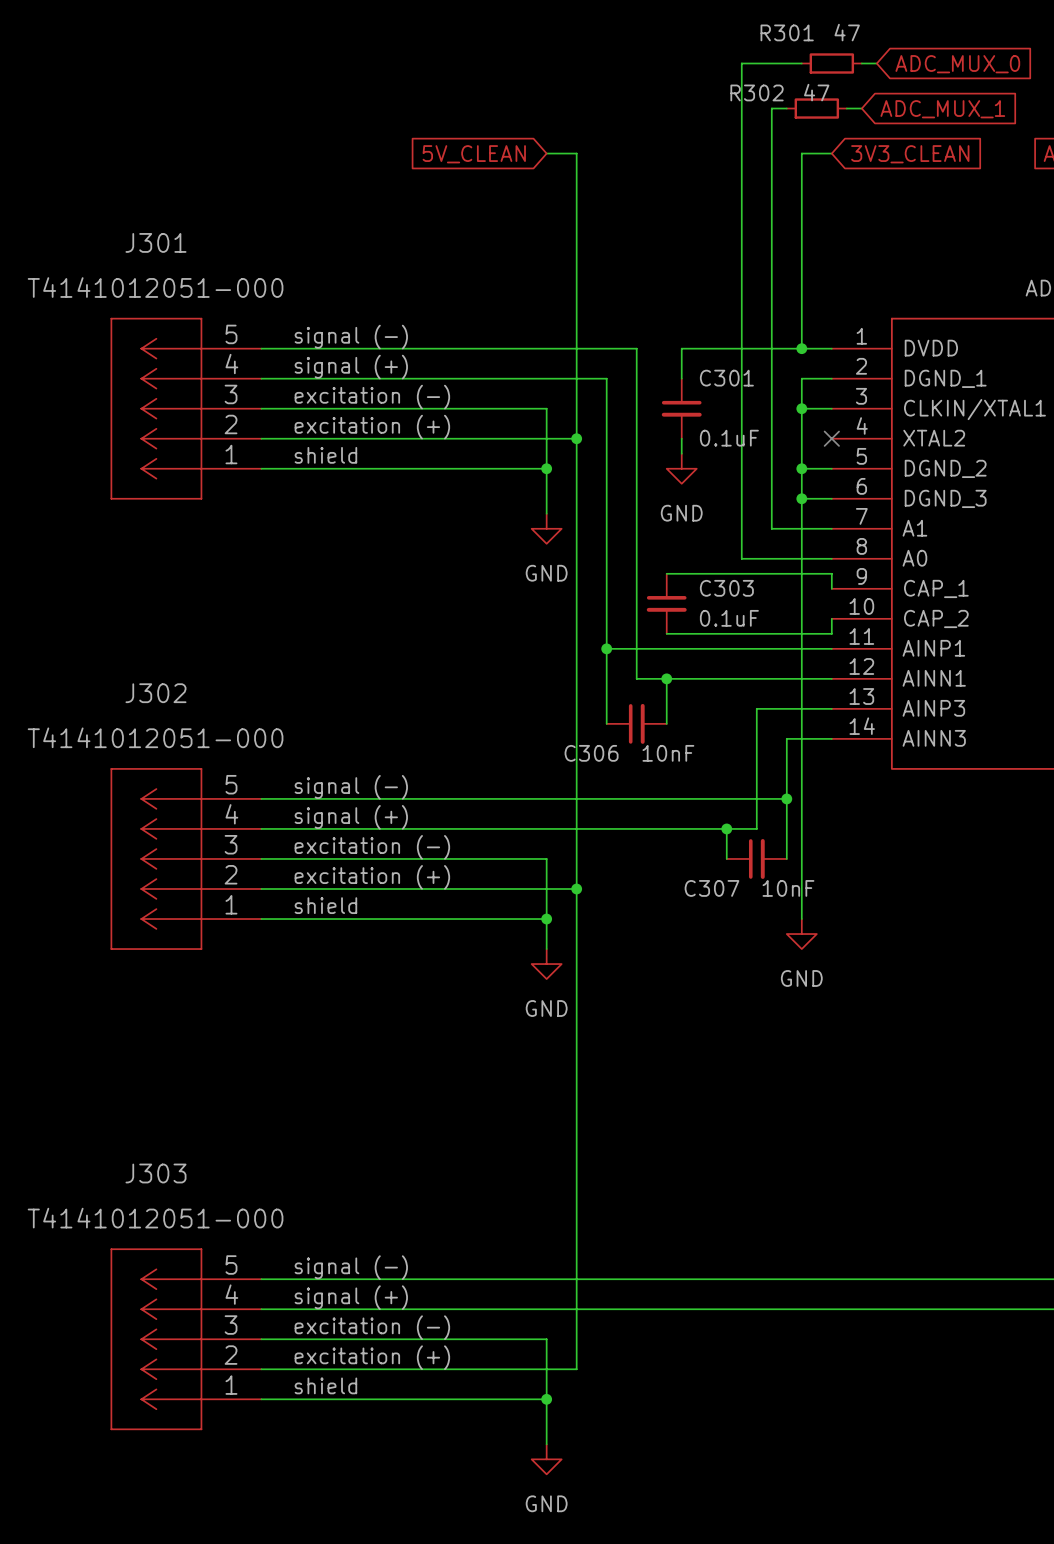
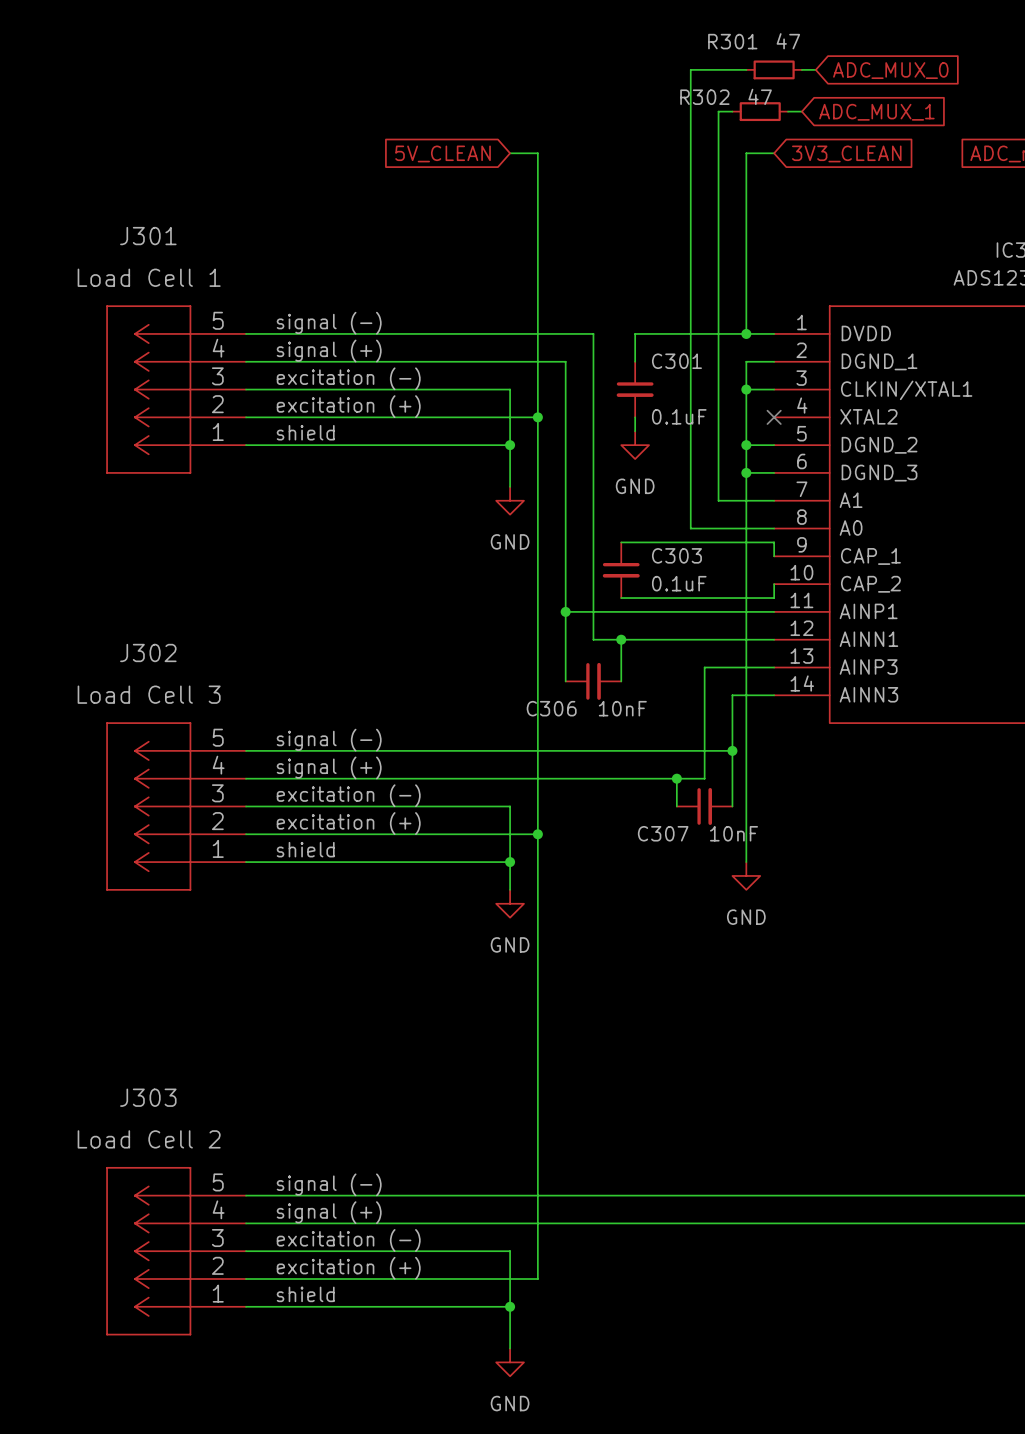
J301 value: T4141012051-000 (155, 287) -> Load Cell 1 (149, 277)
J302 value: T4141012051-000 (155, 737) -> Load Cell 3 (149, 694)
J303 value: T4141012051-000 (155, 1218) -> Load Cell 2 (149, 1139)

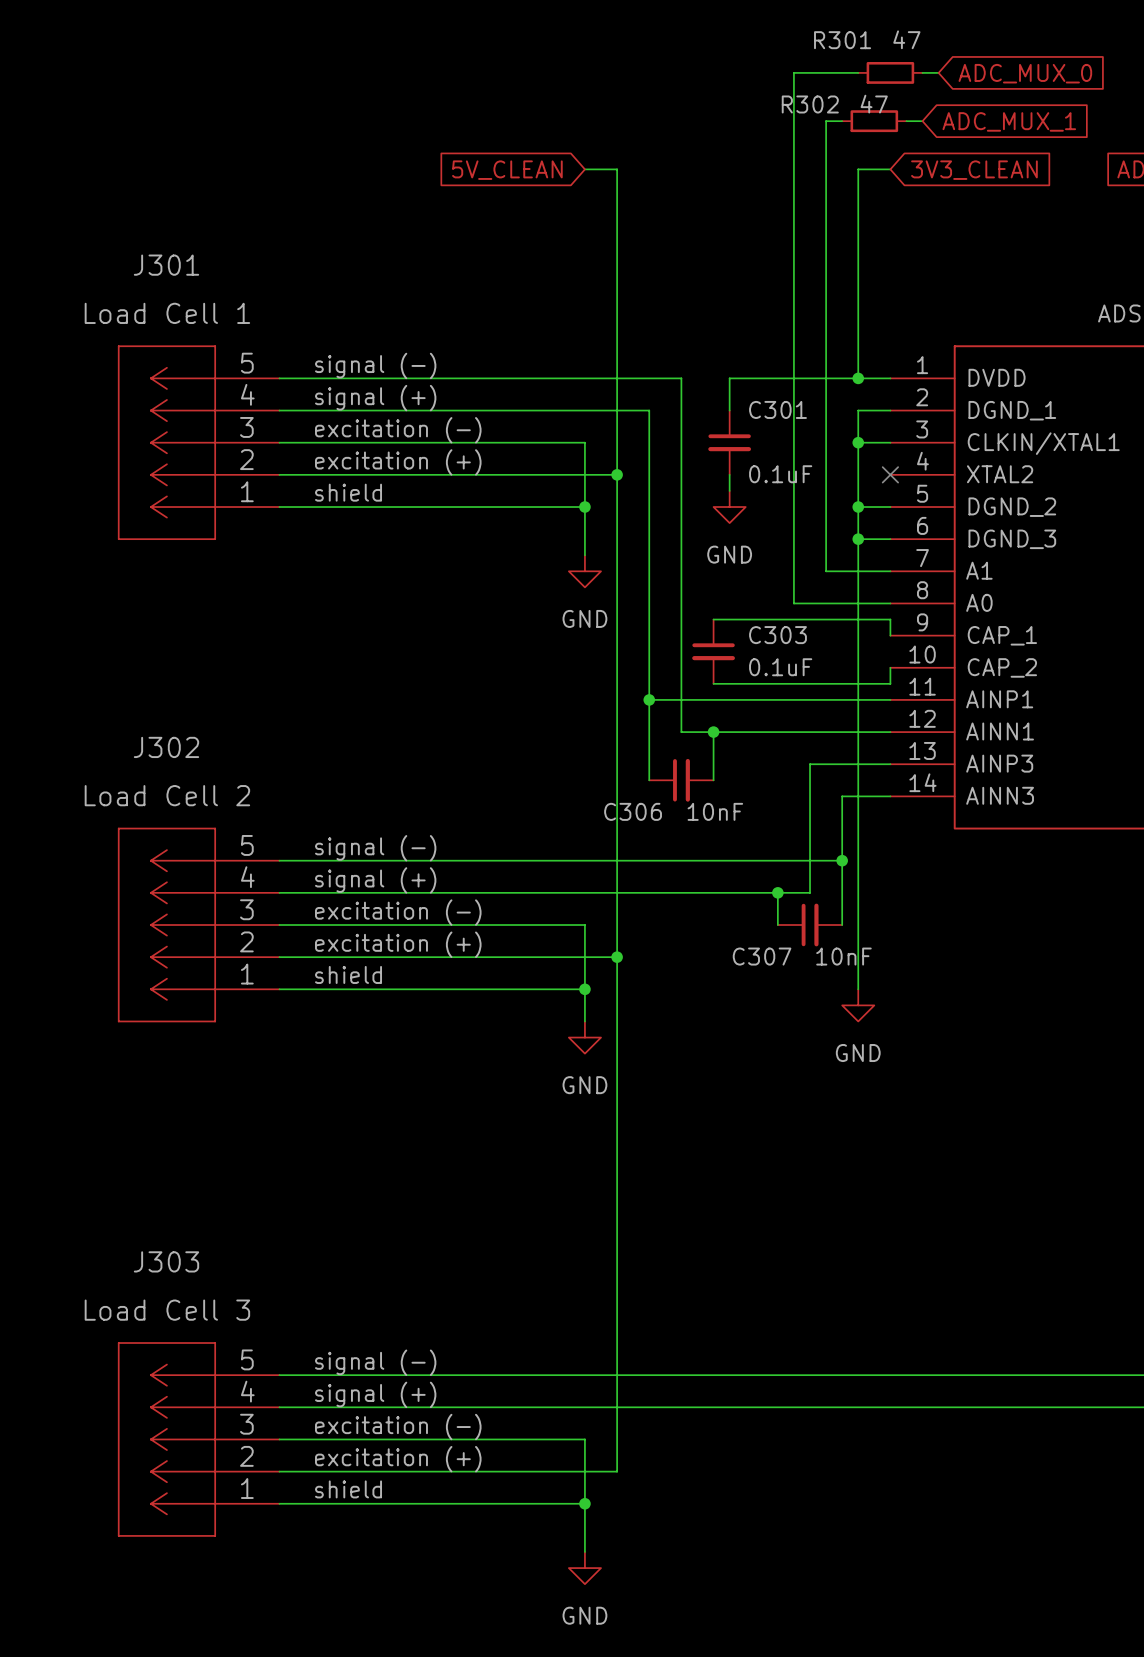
J302 value: Load Cell 3 (149, 694) -> Load Cell 2 (167, 795)
J303 value: Load Cell 2 (149, 1139) -> Load Cell 3 (167, 1310)

